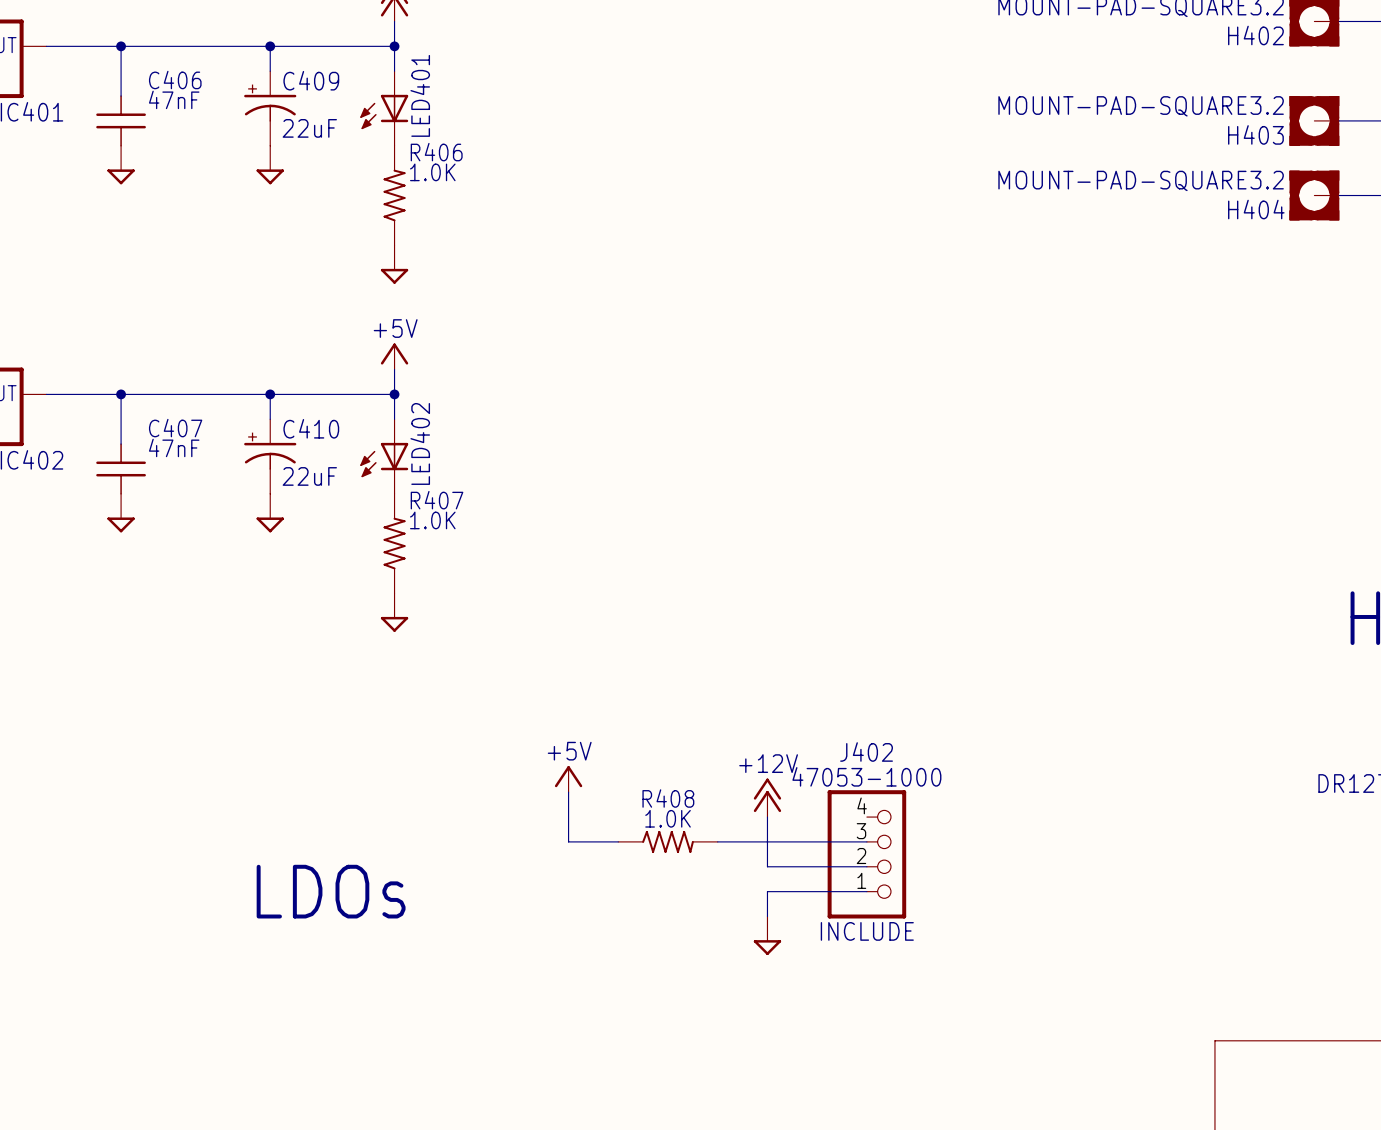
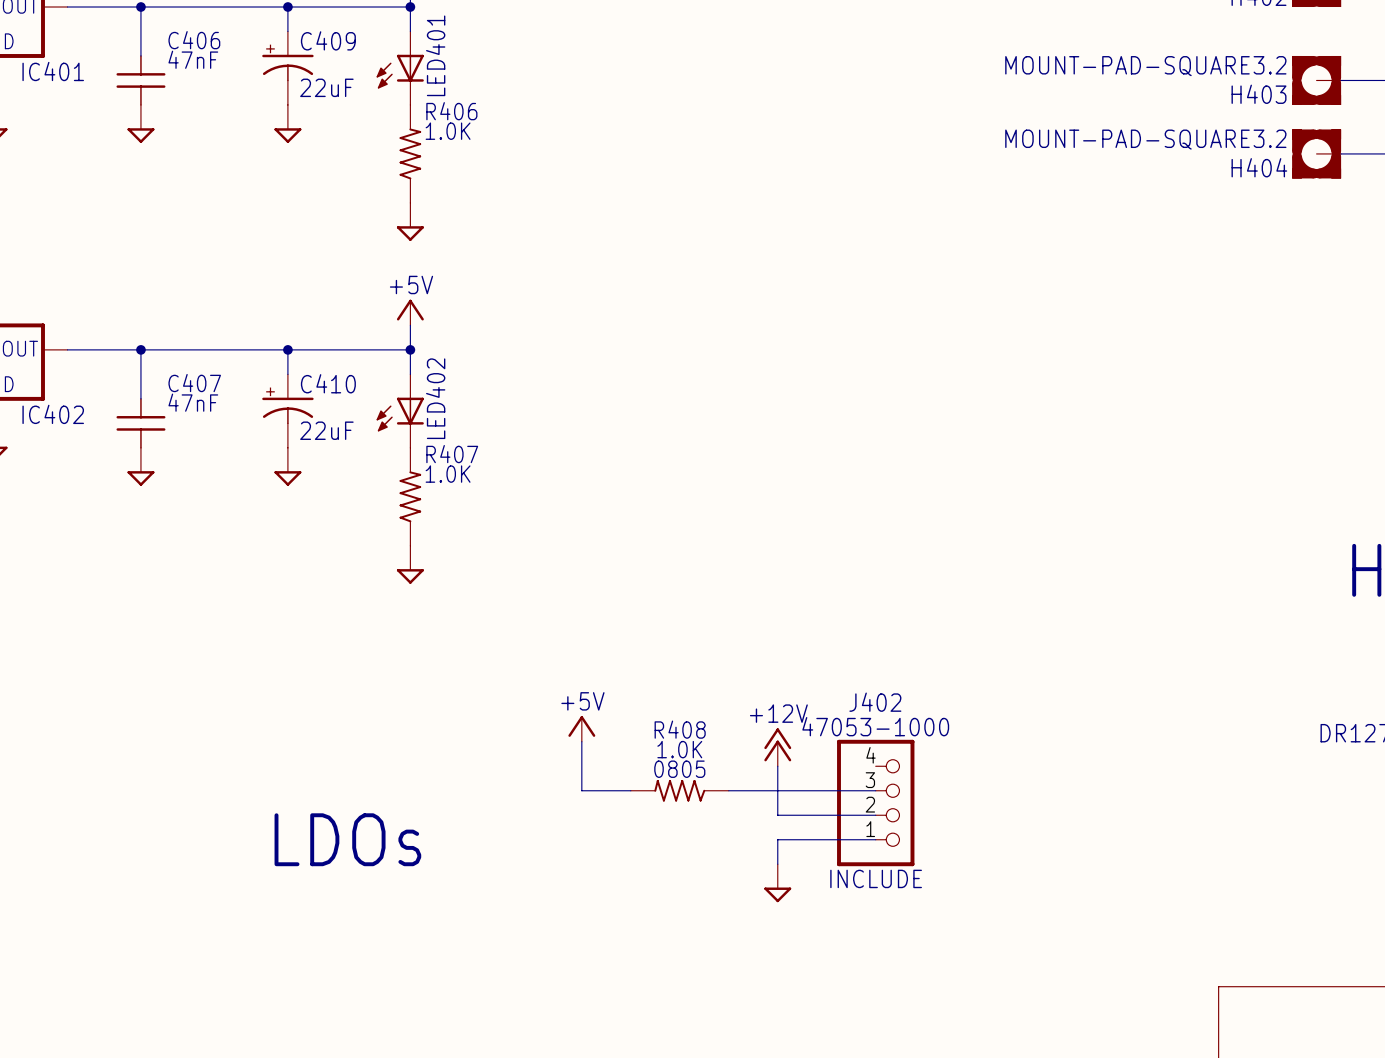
R408 text: none -> 0805 (679, 769)
R408 rotation: 0° (668, 841) -> 180° (679, 790)

